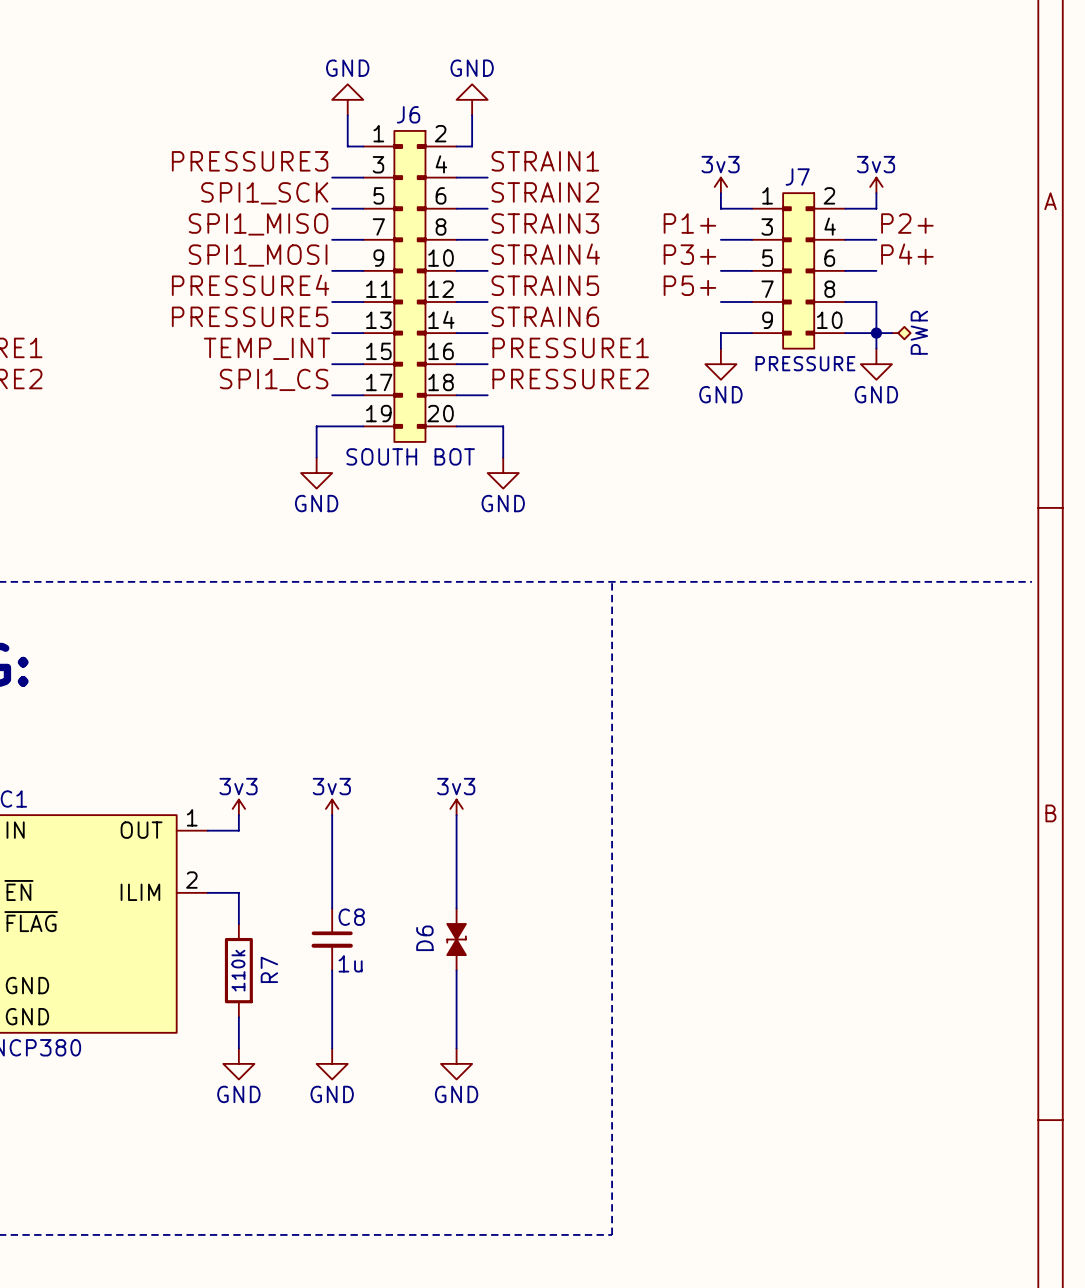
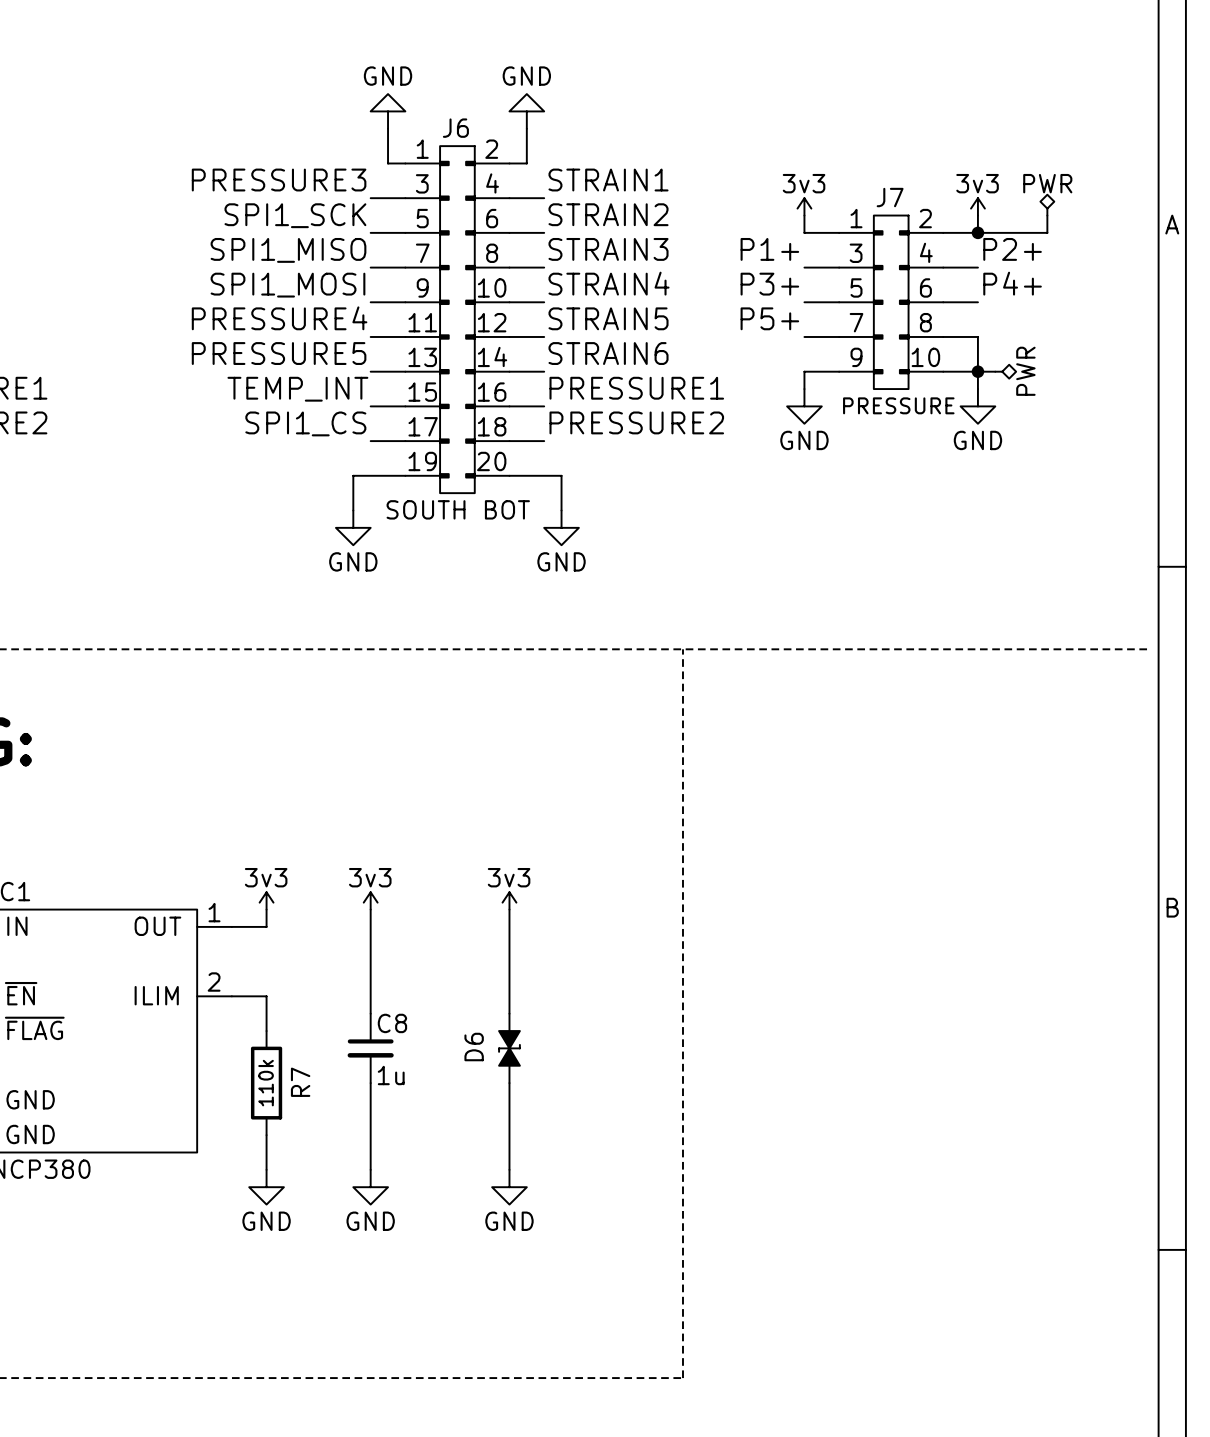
power symbol: none -> PWR (1047, 205)
wire: none -> (1047, 215) (1047, 232) (977, 232)
junction: none -> (977, 232)

